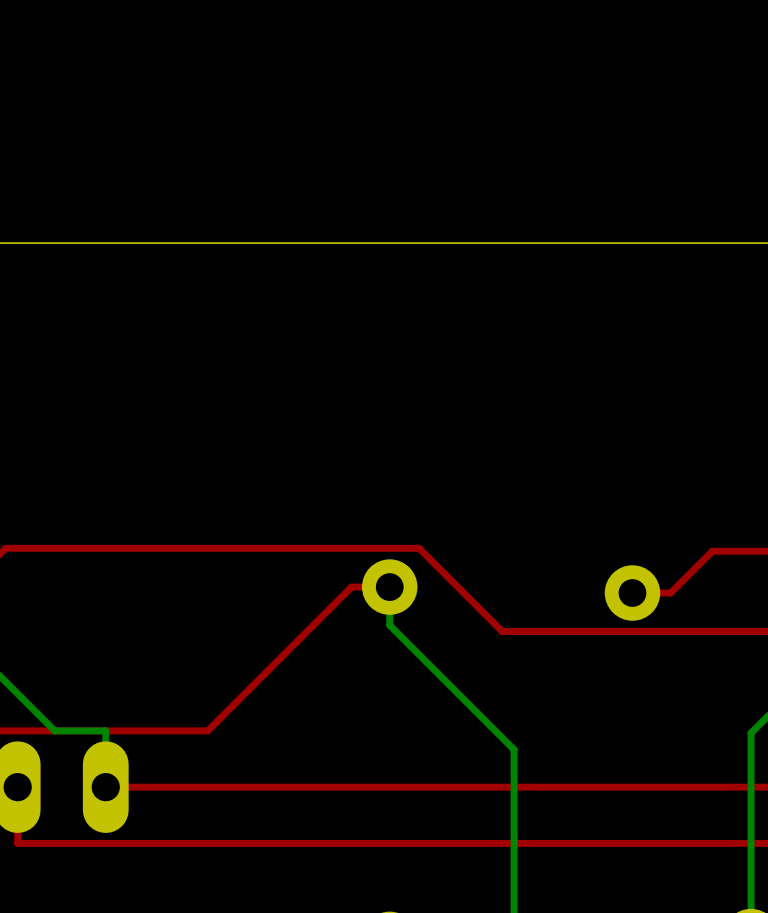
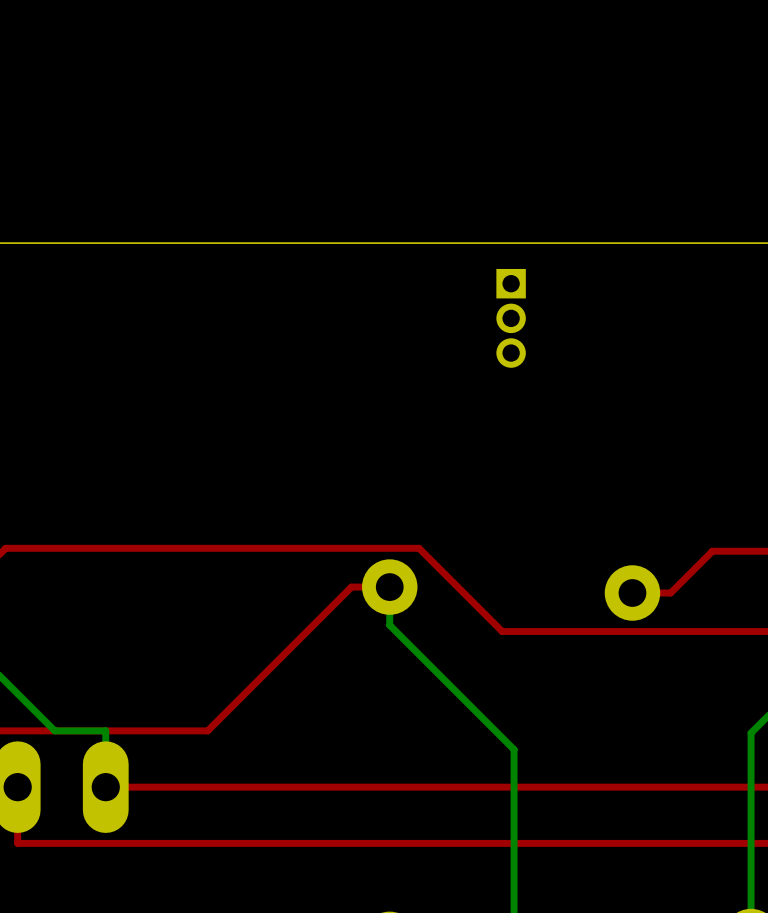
part: none -> (511, 318)

